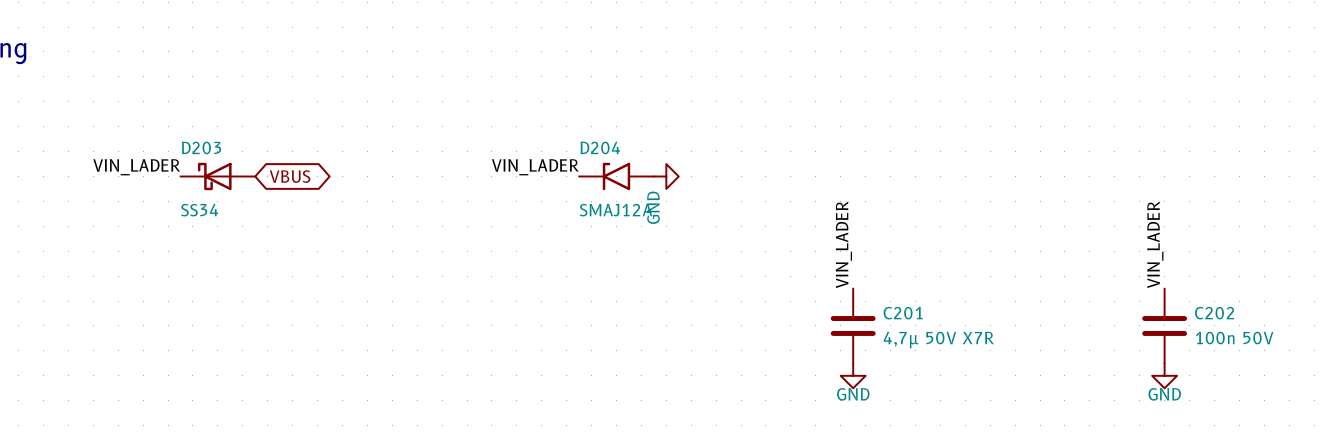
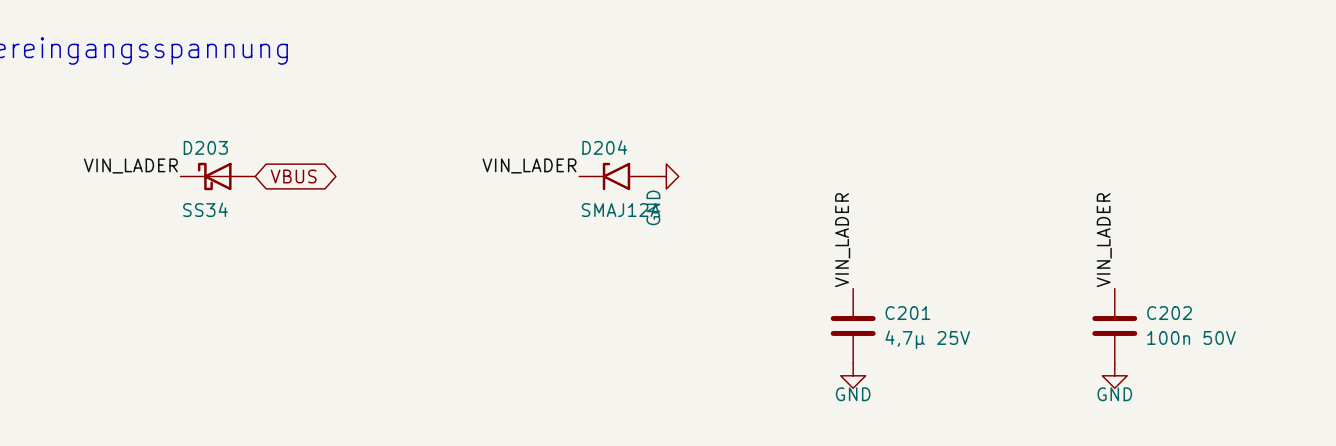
label position: VIN_LADER (1155, 244) -> VIN_LADER (1104, 240)
C202 position: (1164, 325) -> (1114, 325)
C201 value: 4,7µ 50V X7R (938, 340) -> 4,7µ 25V (927, 339)
power symbol position: GND (1164, 375) -> GND (1114, 375)

